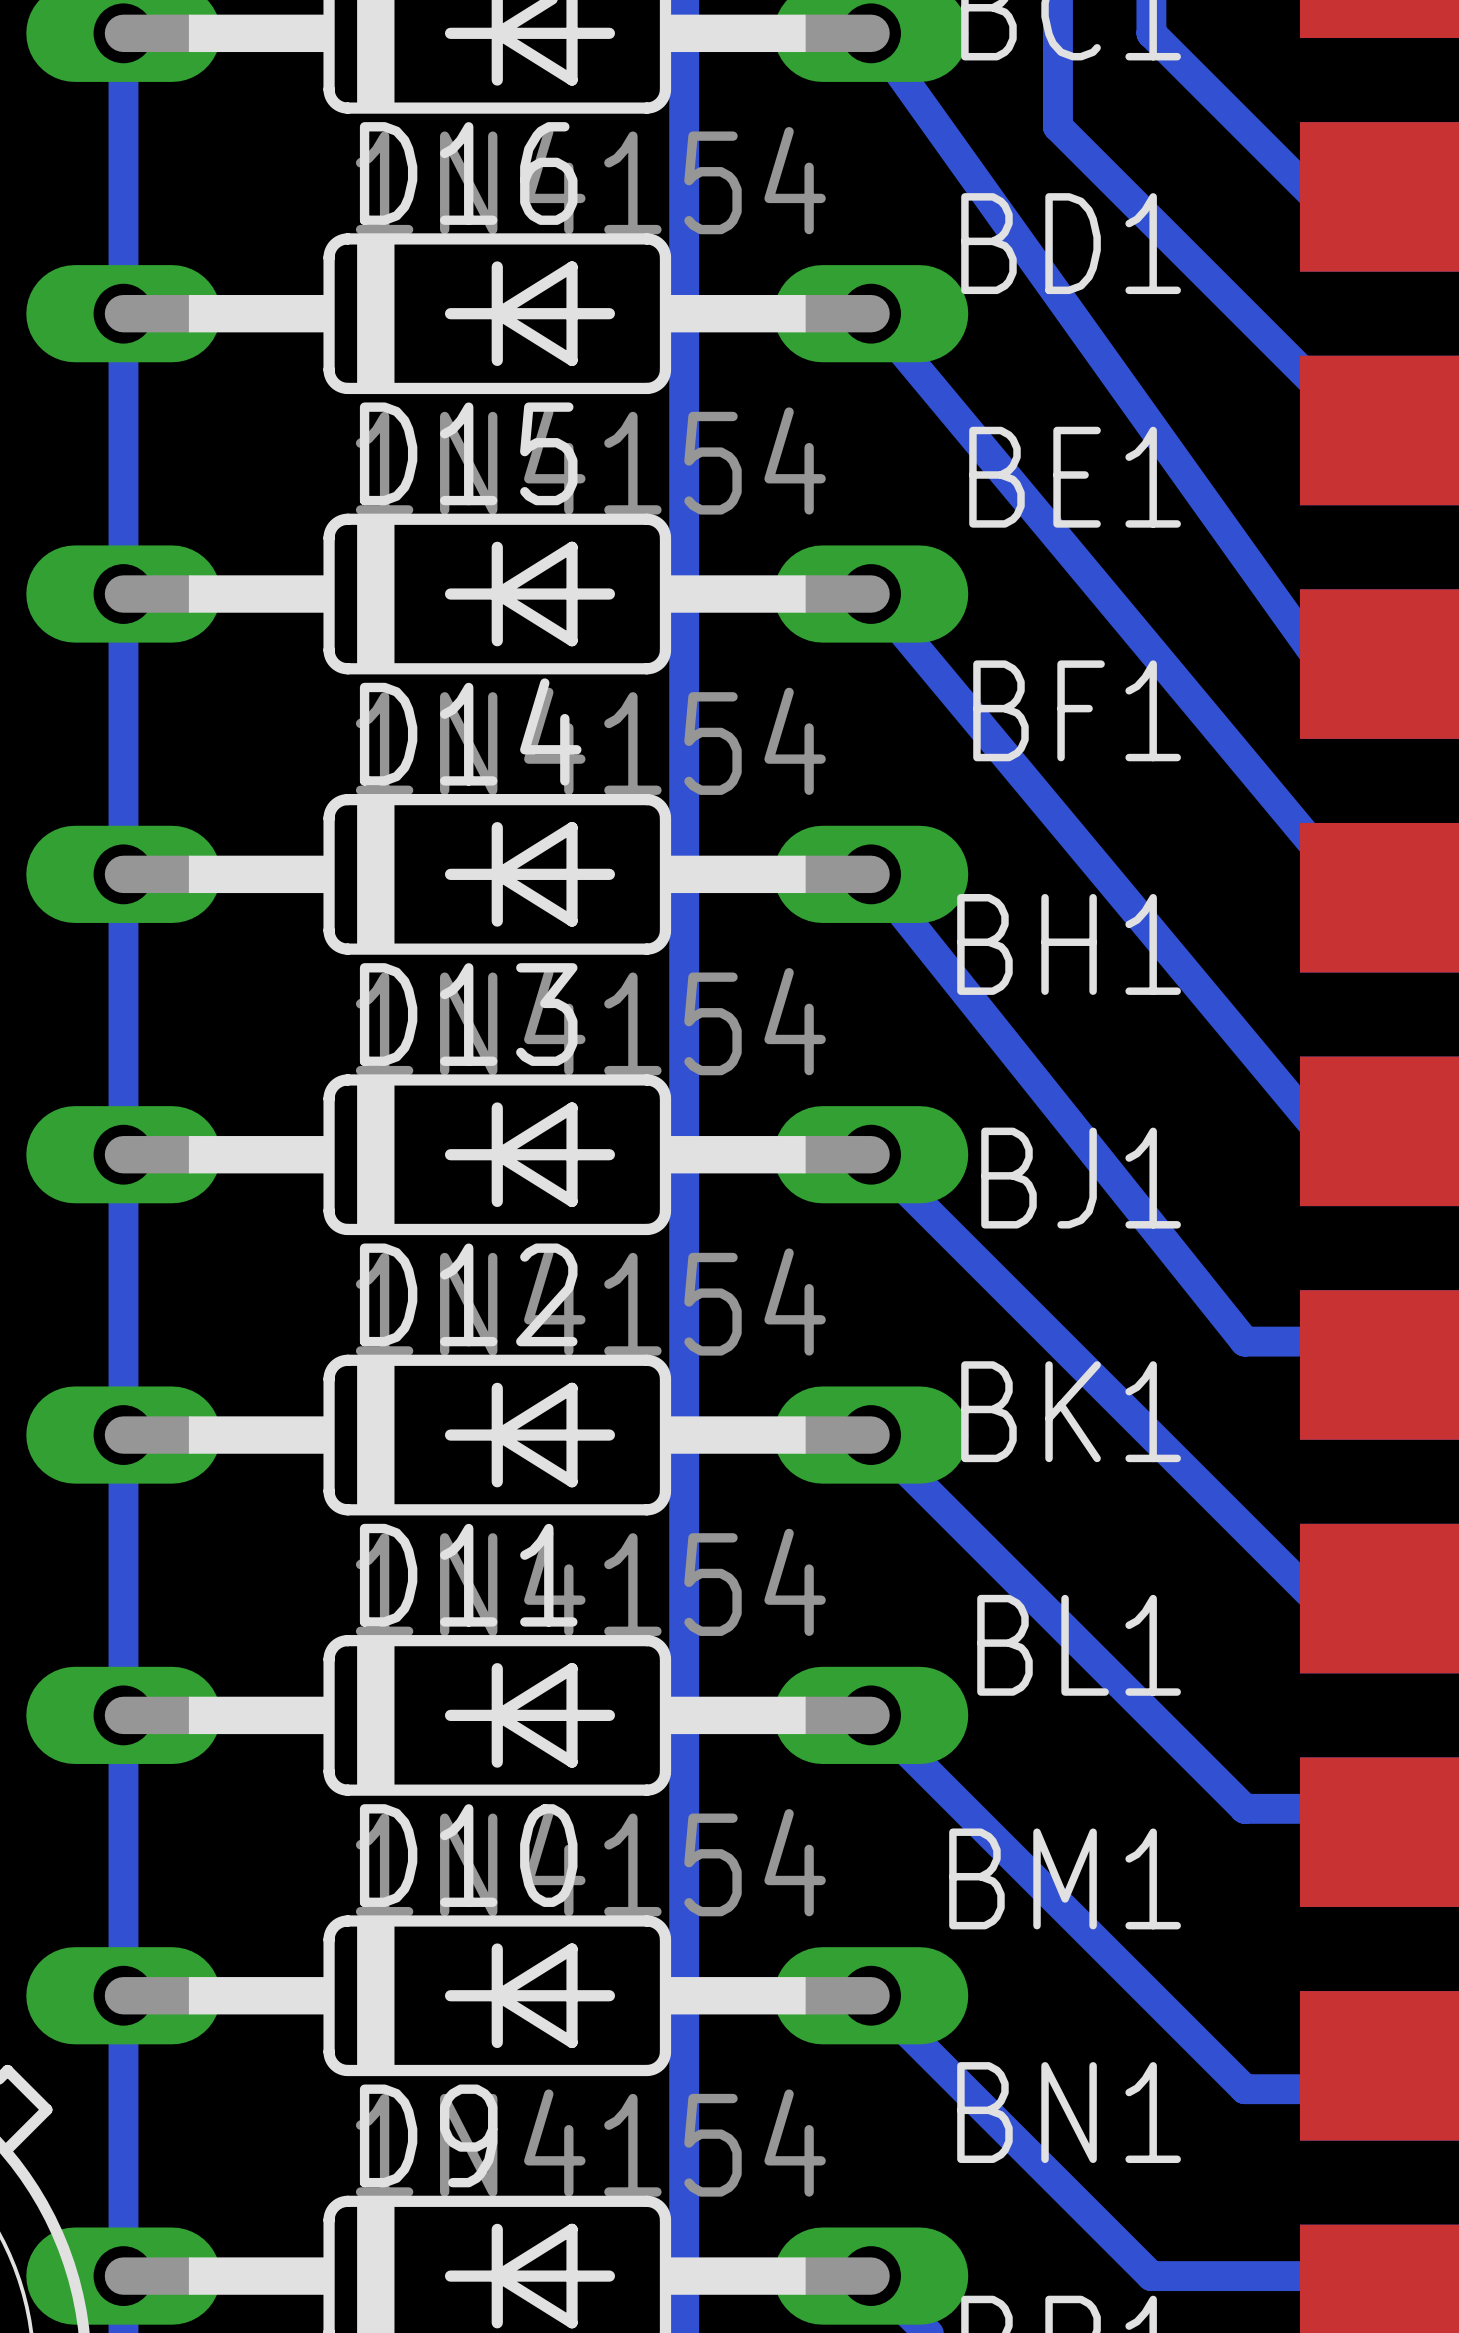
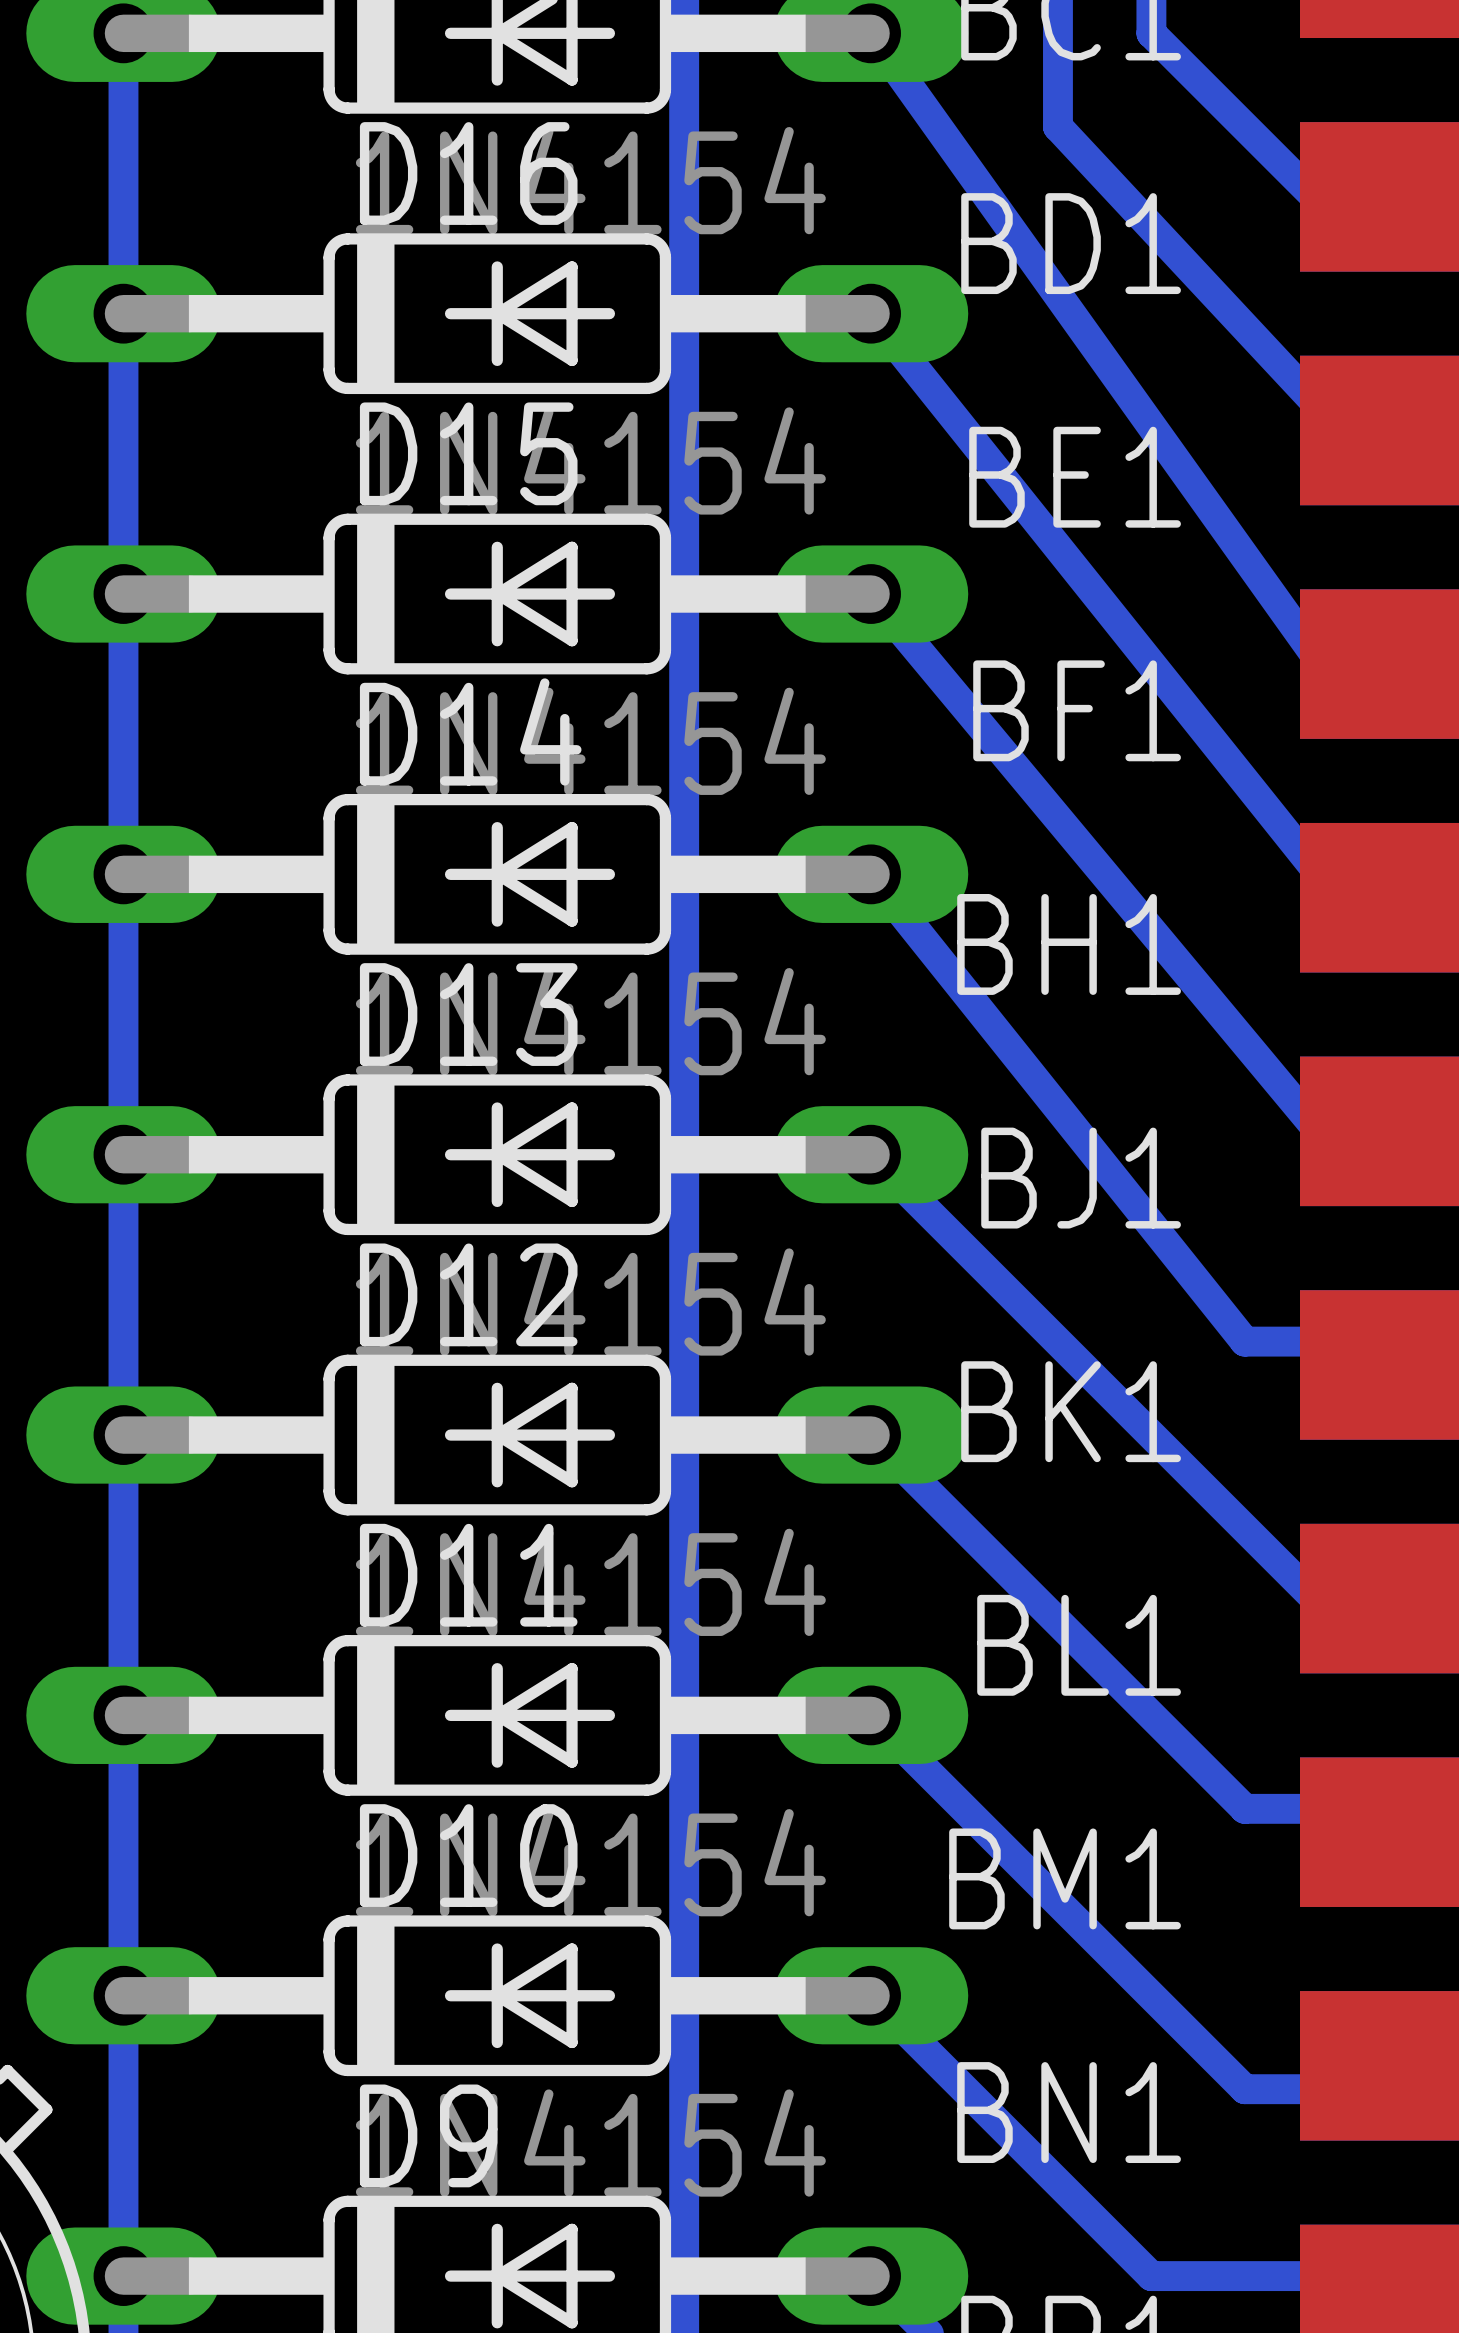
bottom track: (1057, 126) (1338, 407) -> (1057, 126) (1319, 407) (1338, 407)
bottom track: (871, 313) (1338, 874) -> (871, 313) (1319, 874) (1338, 874)

